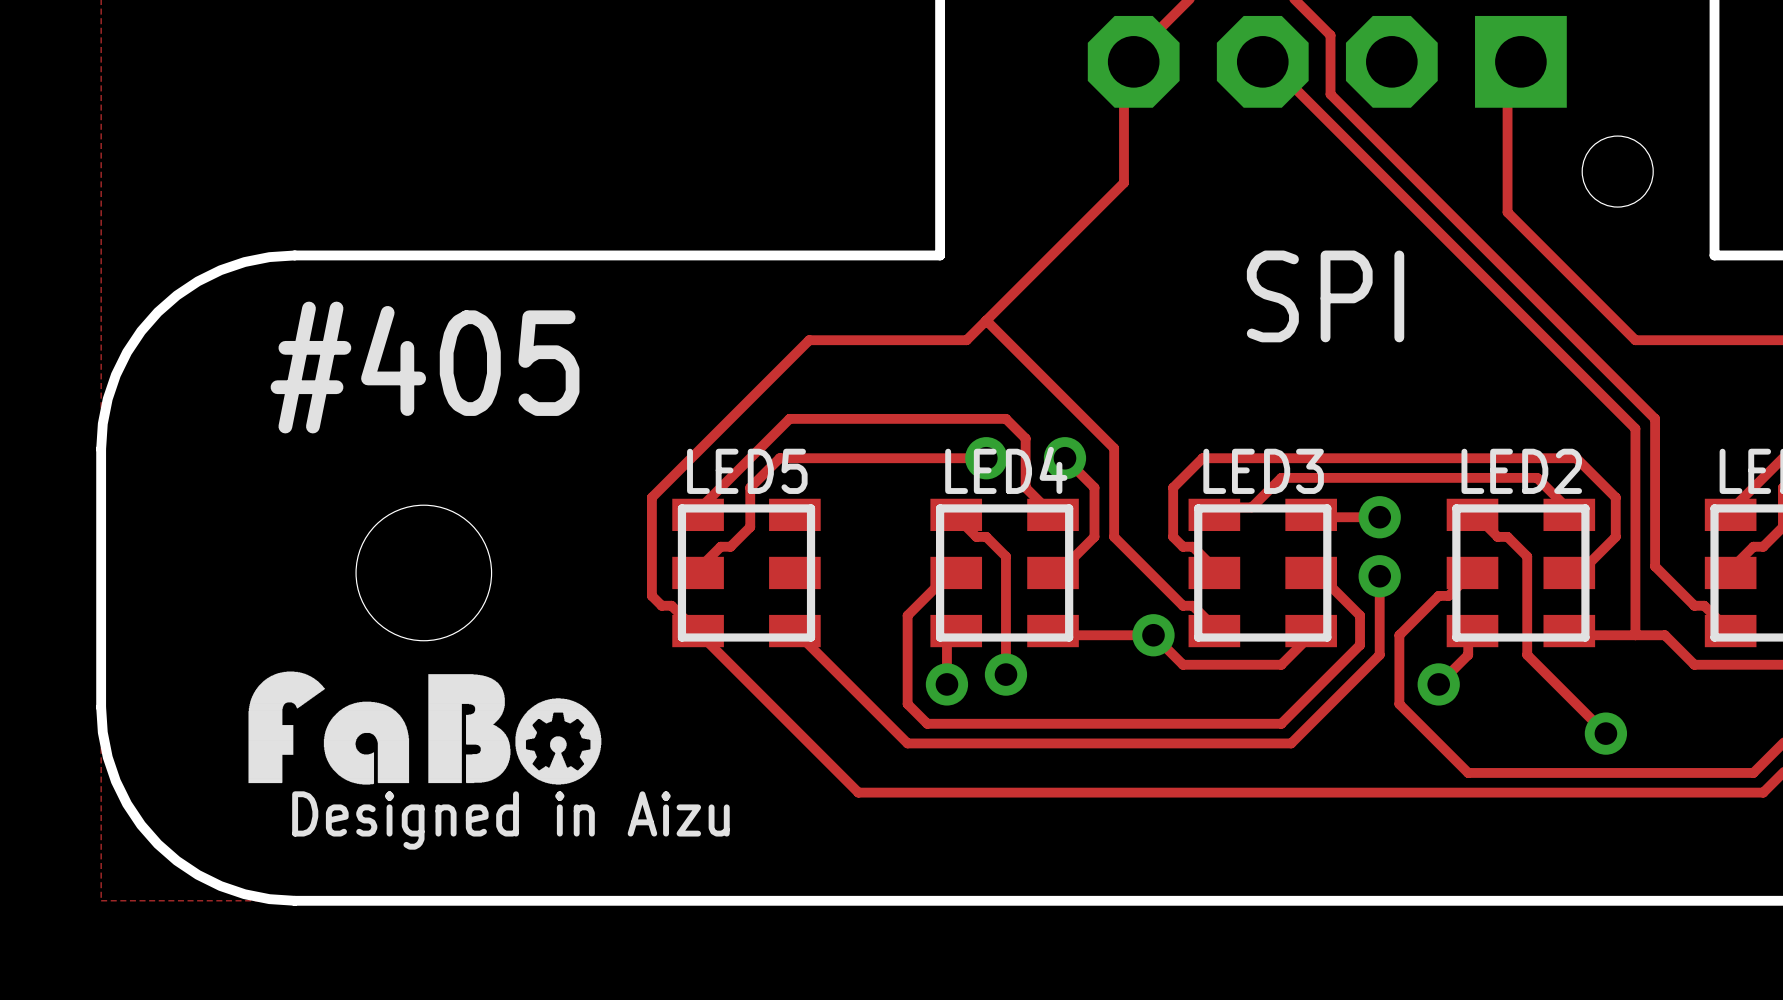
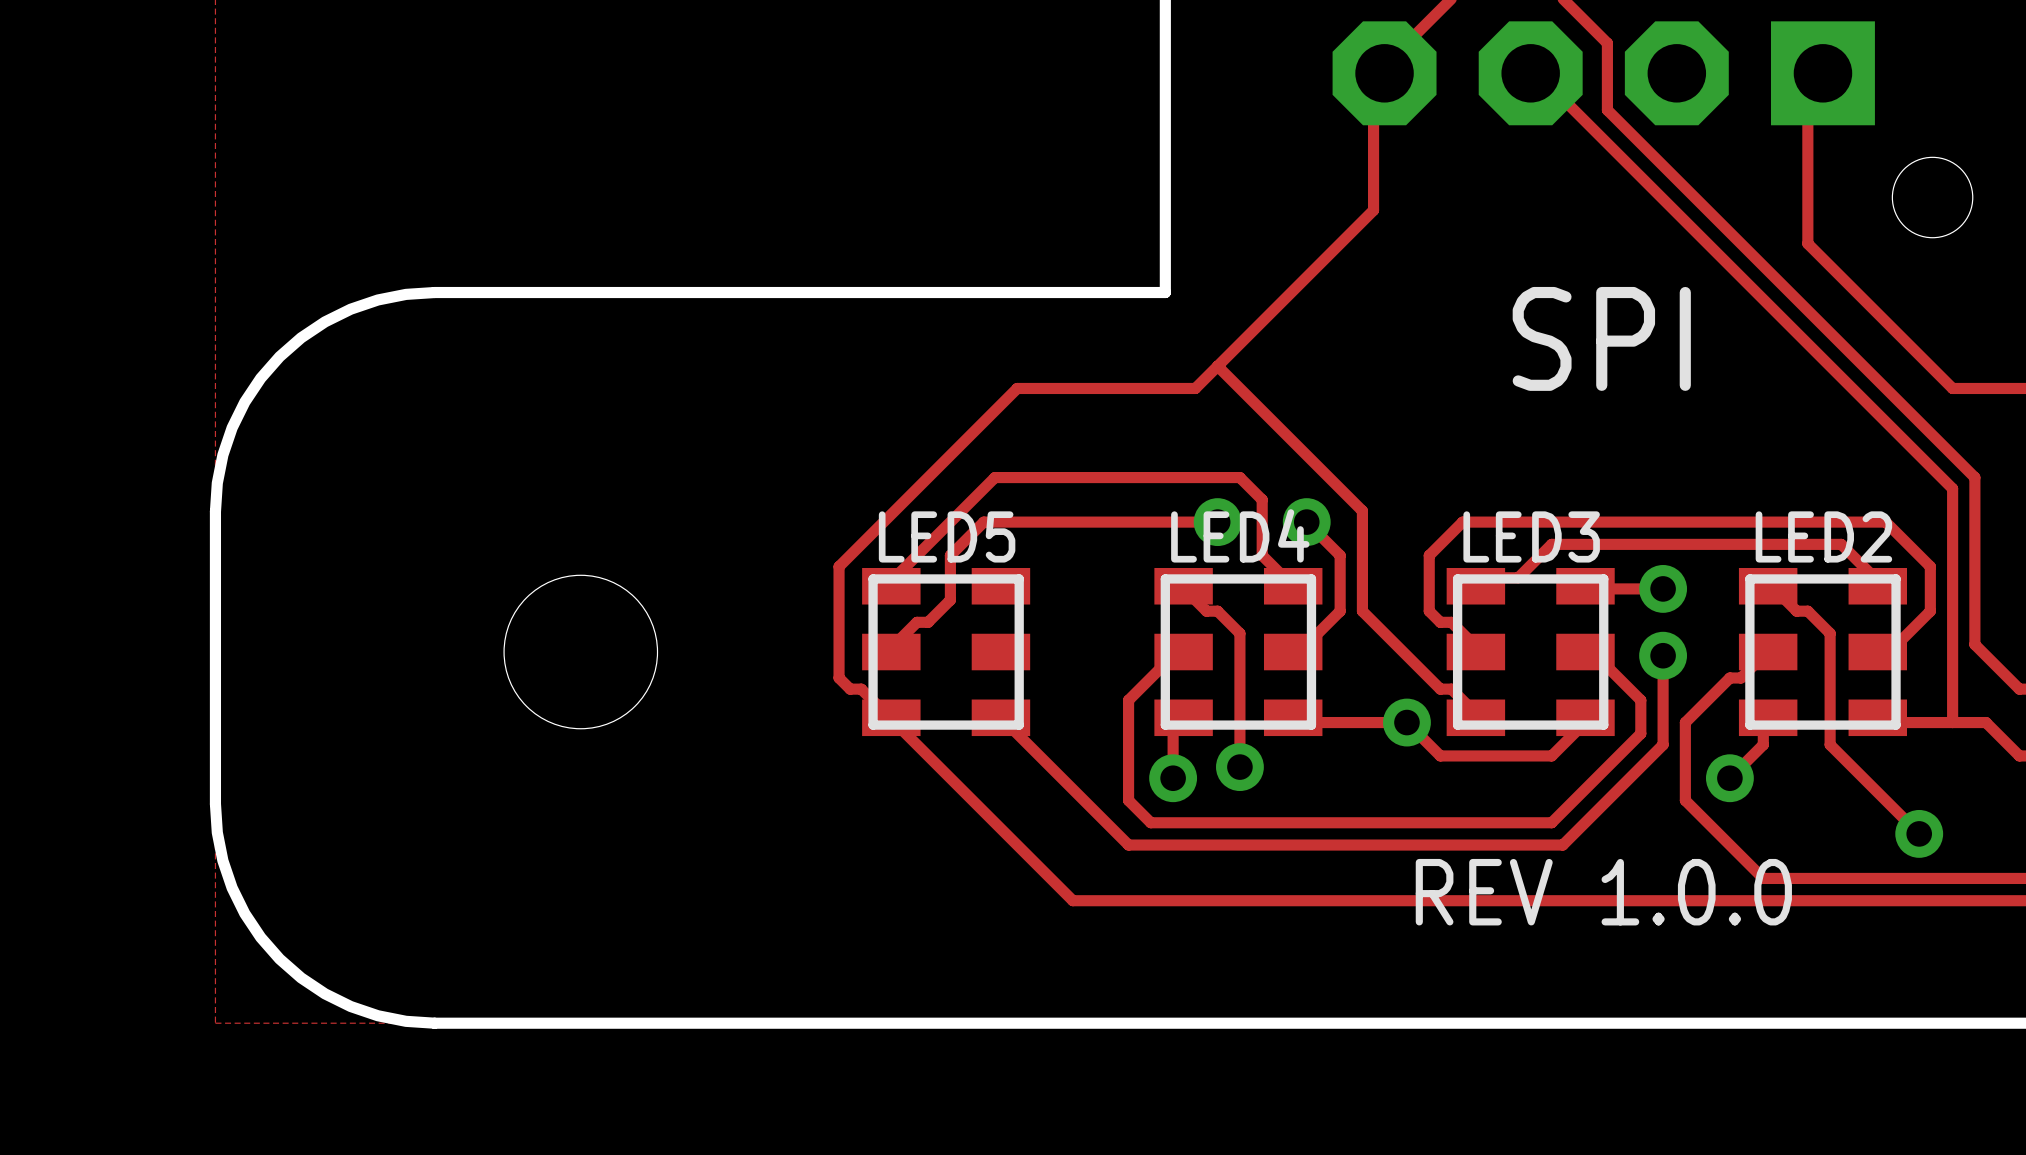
text: #405 (425, 367) -> none
drawing: [248, 671, 602, 785] -> none
text: none -> REV 1.0.0 (1603, 892)
text: Designed in Aizu (510, 820) -> none

